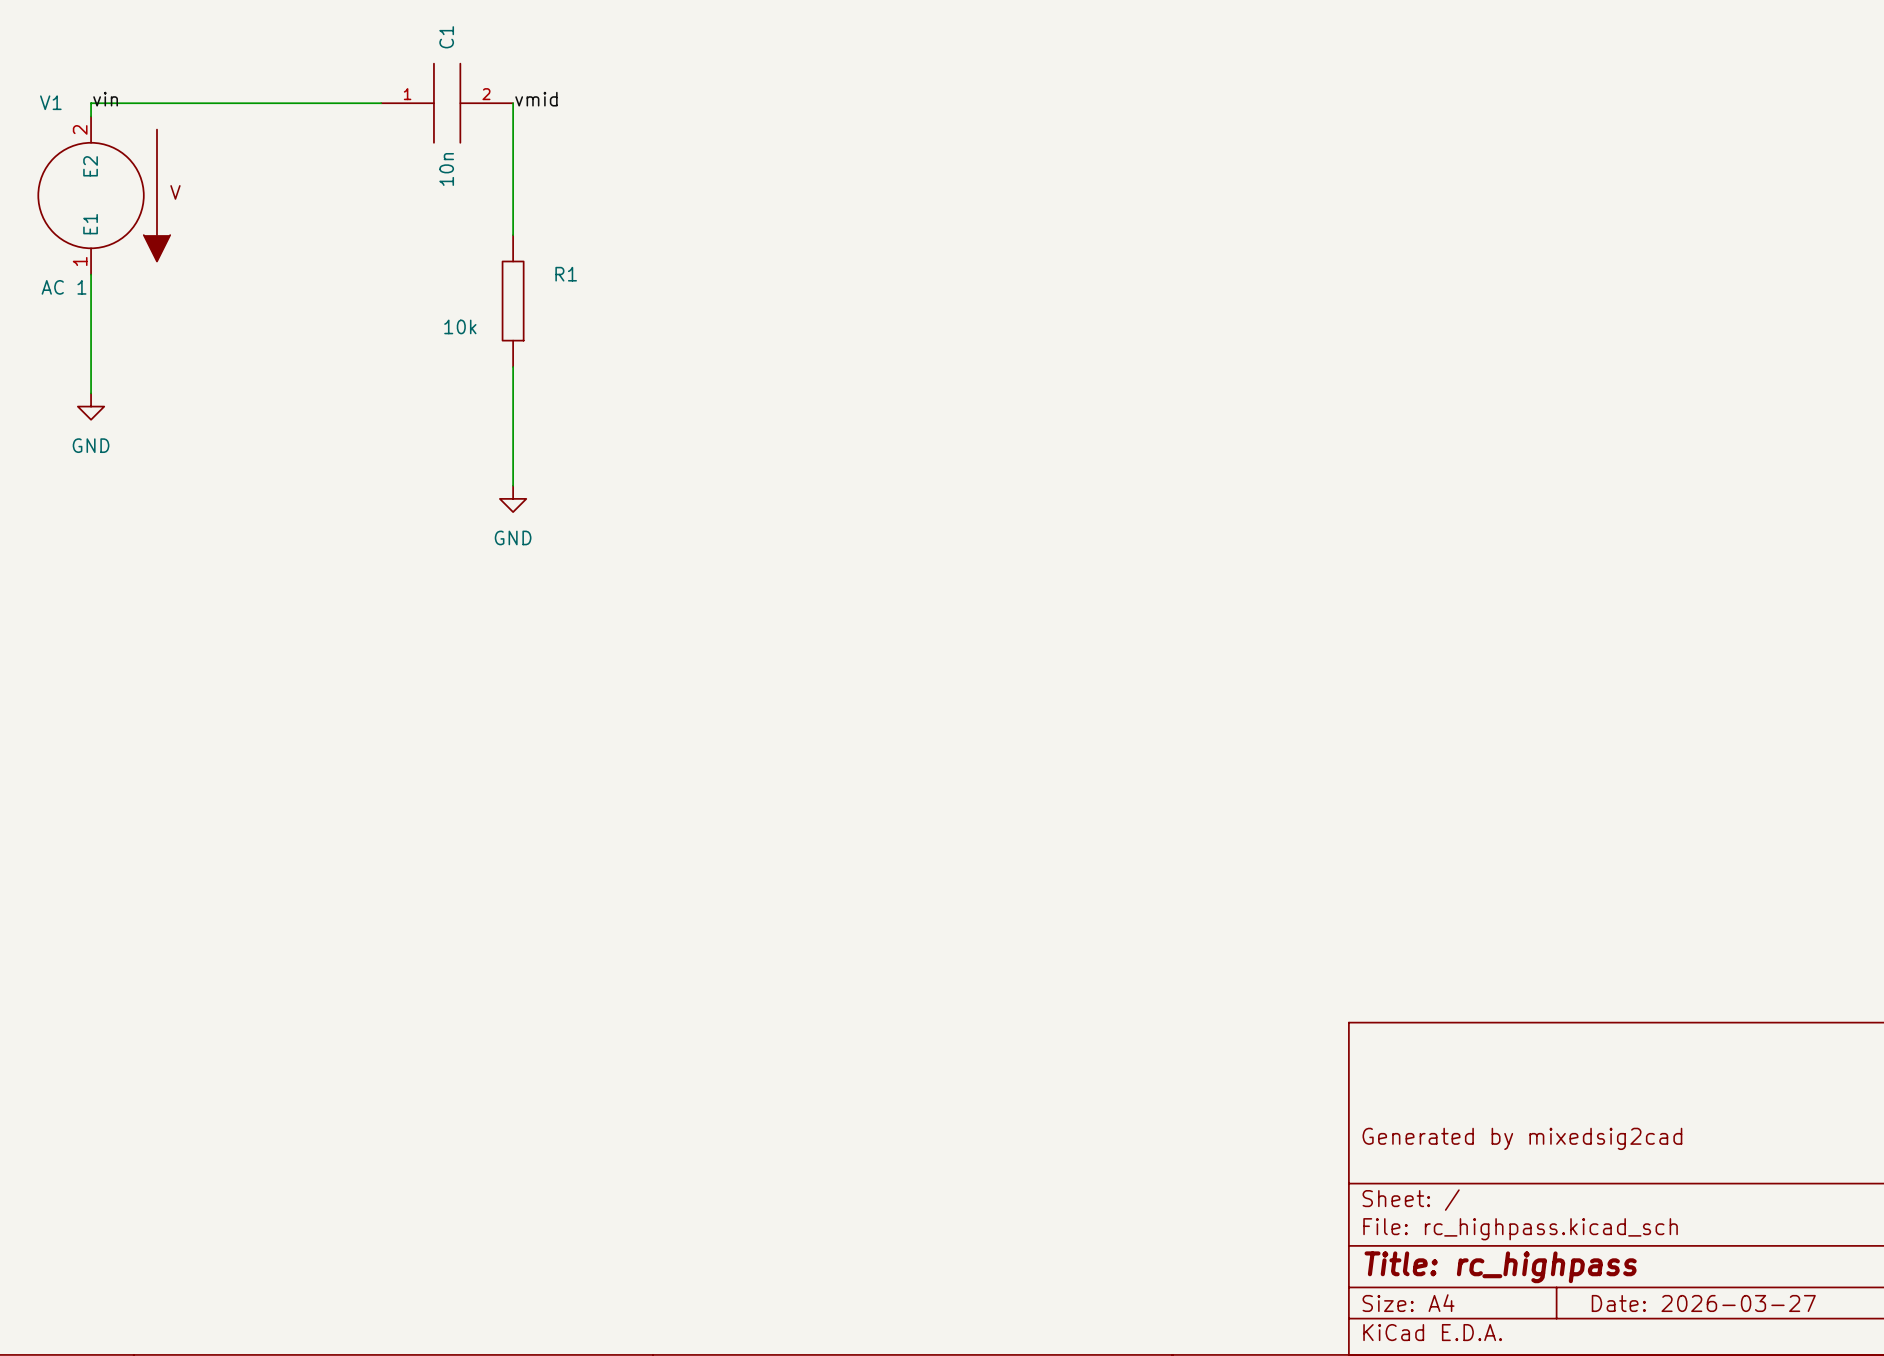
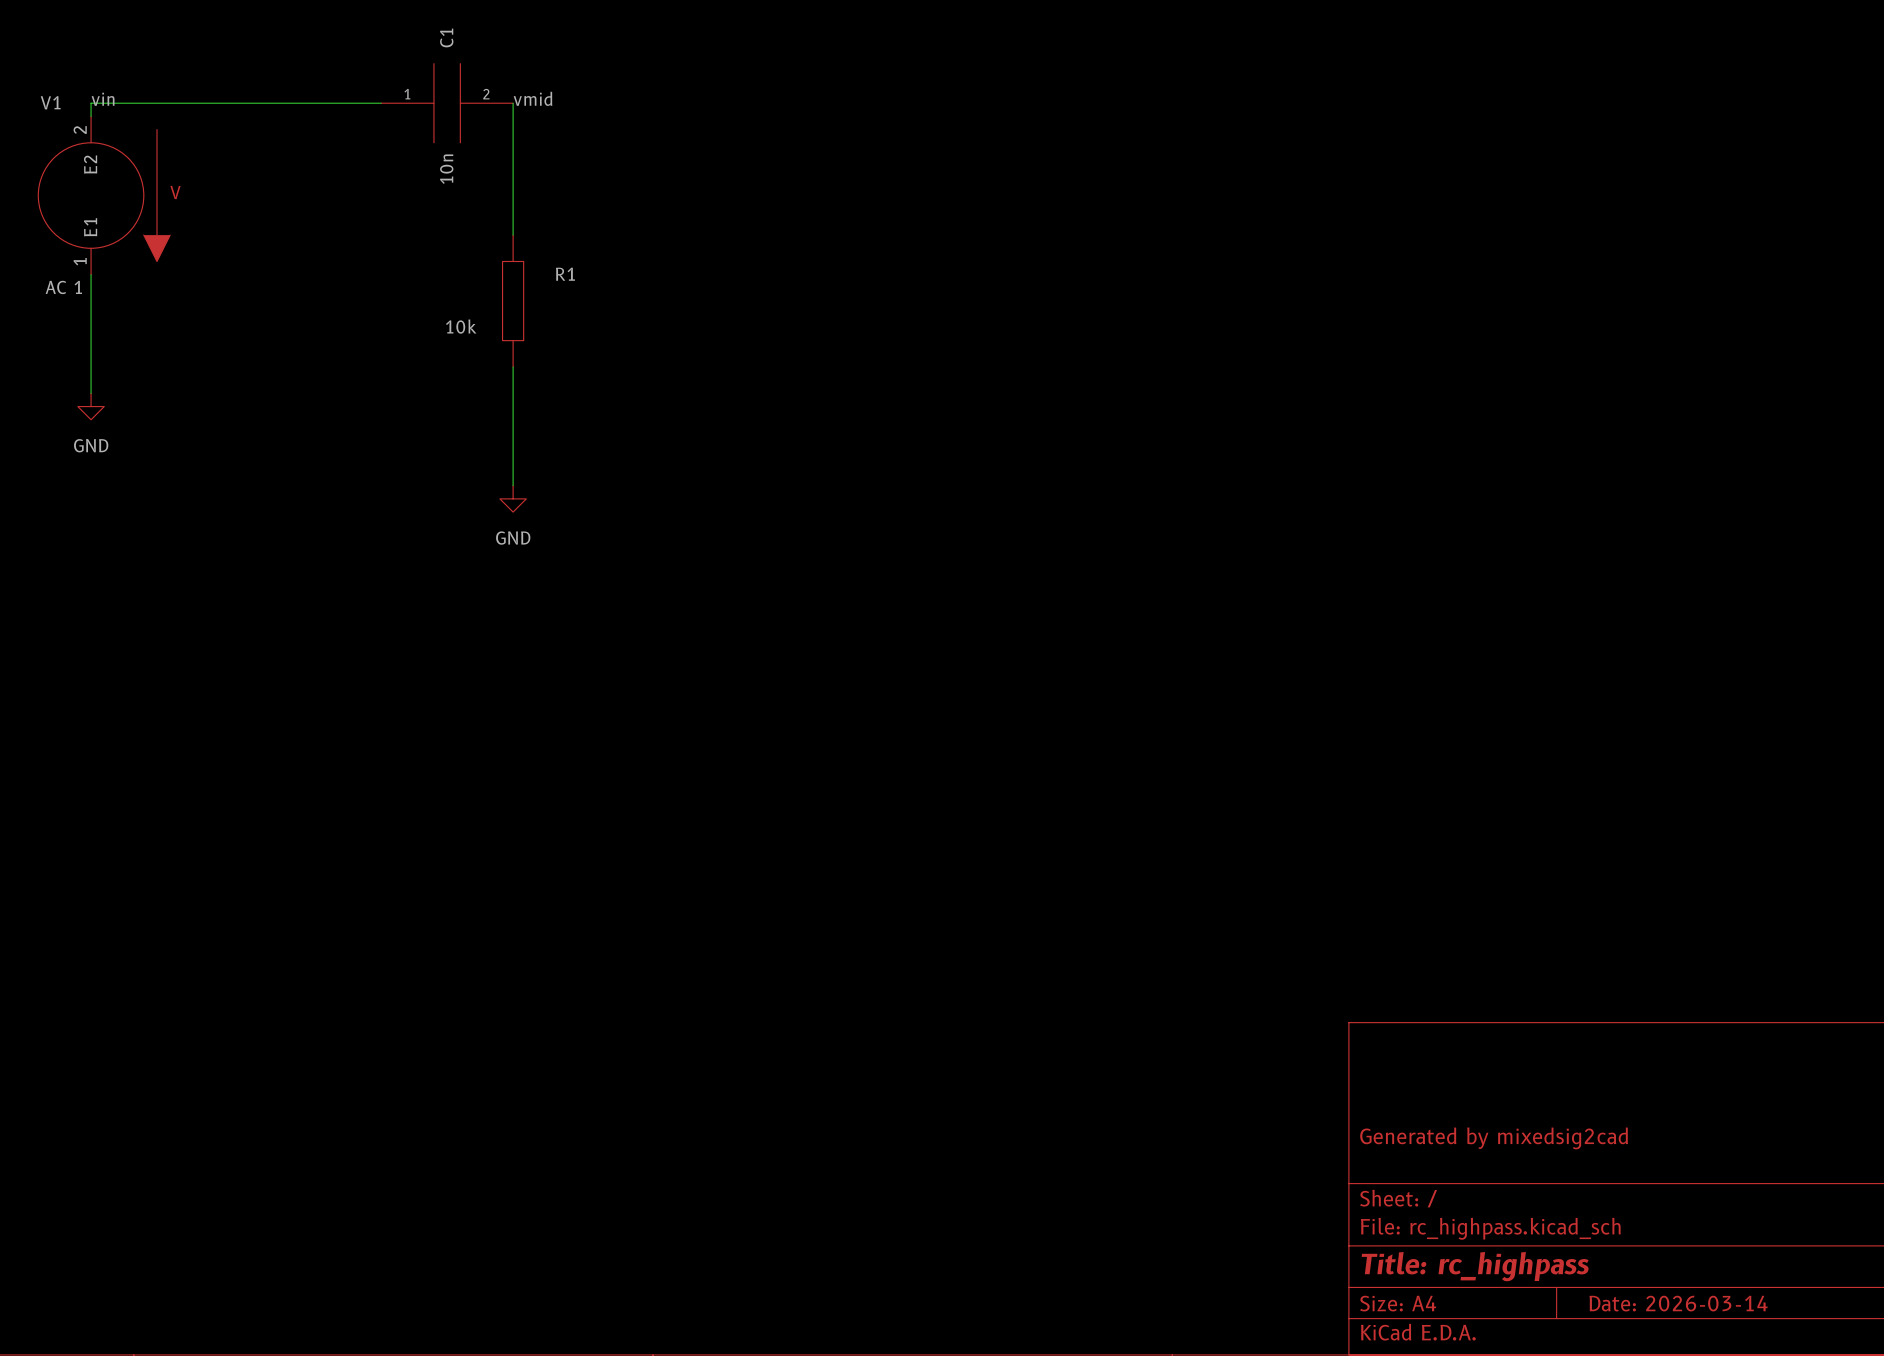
title block: Date: 2026-03-27 (1703, 1303) -> Date: 2026-03-14 (1678, 1303)

